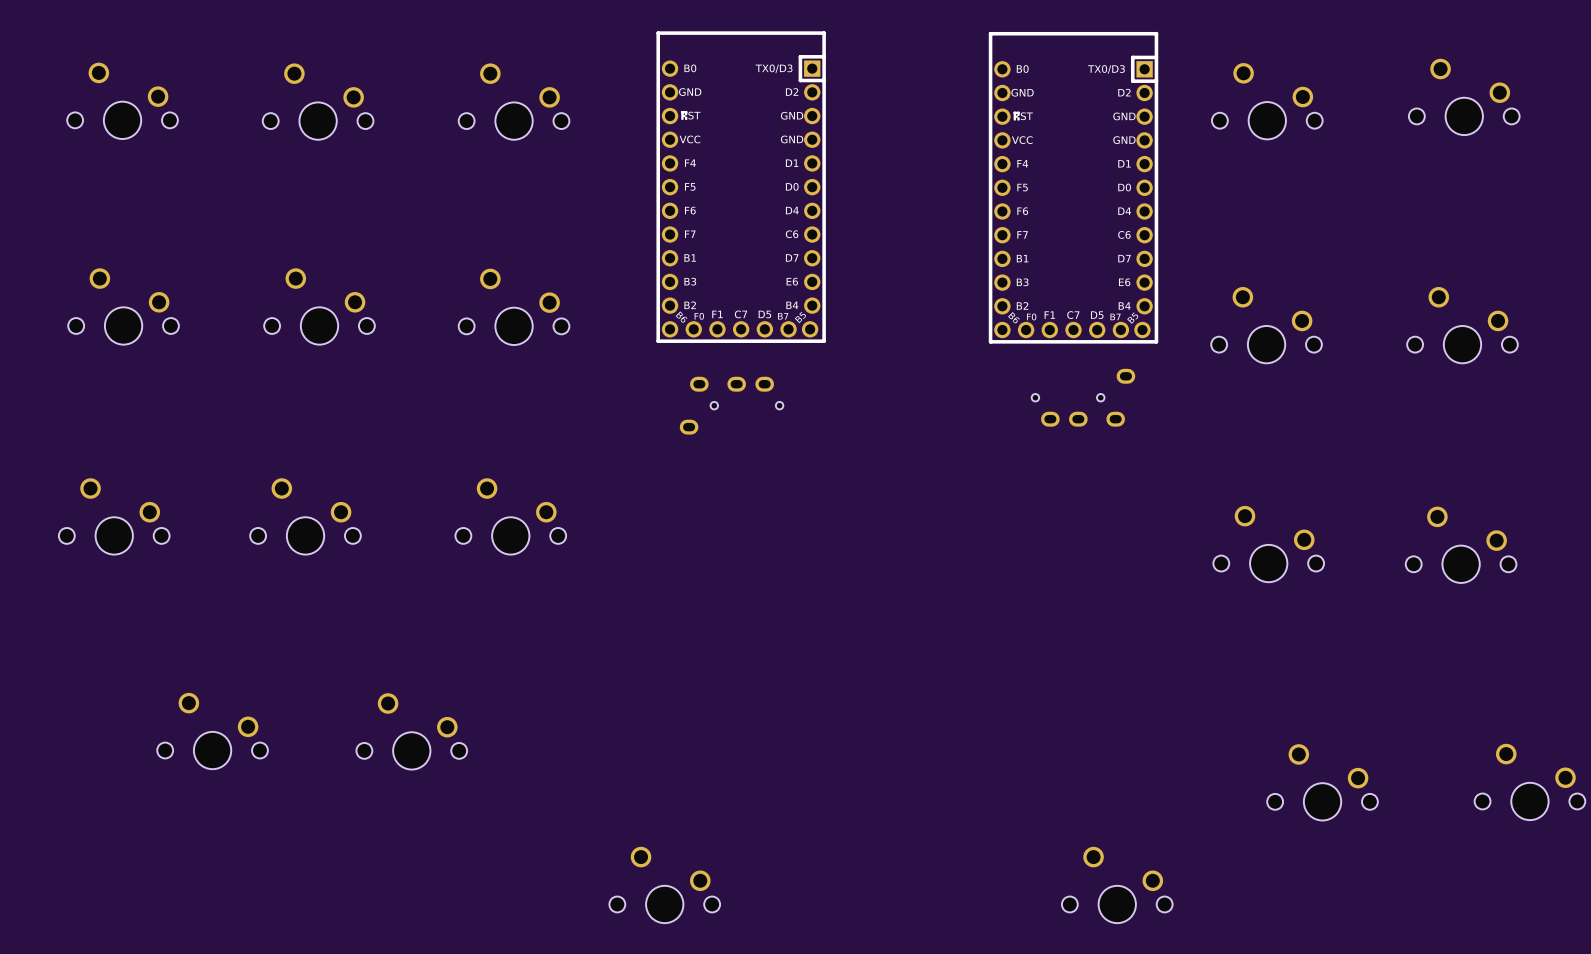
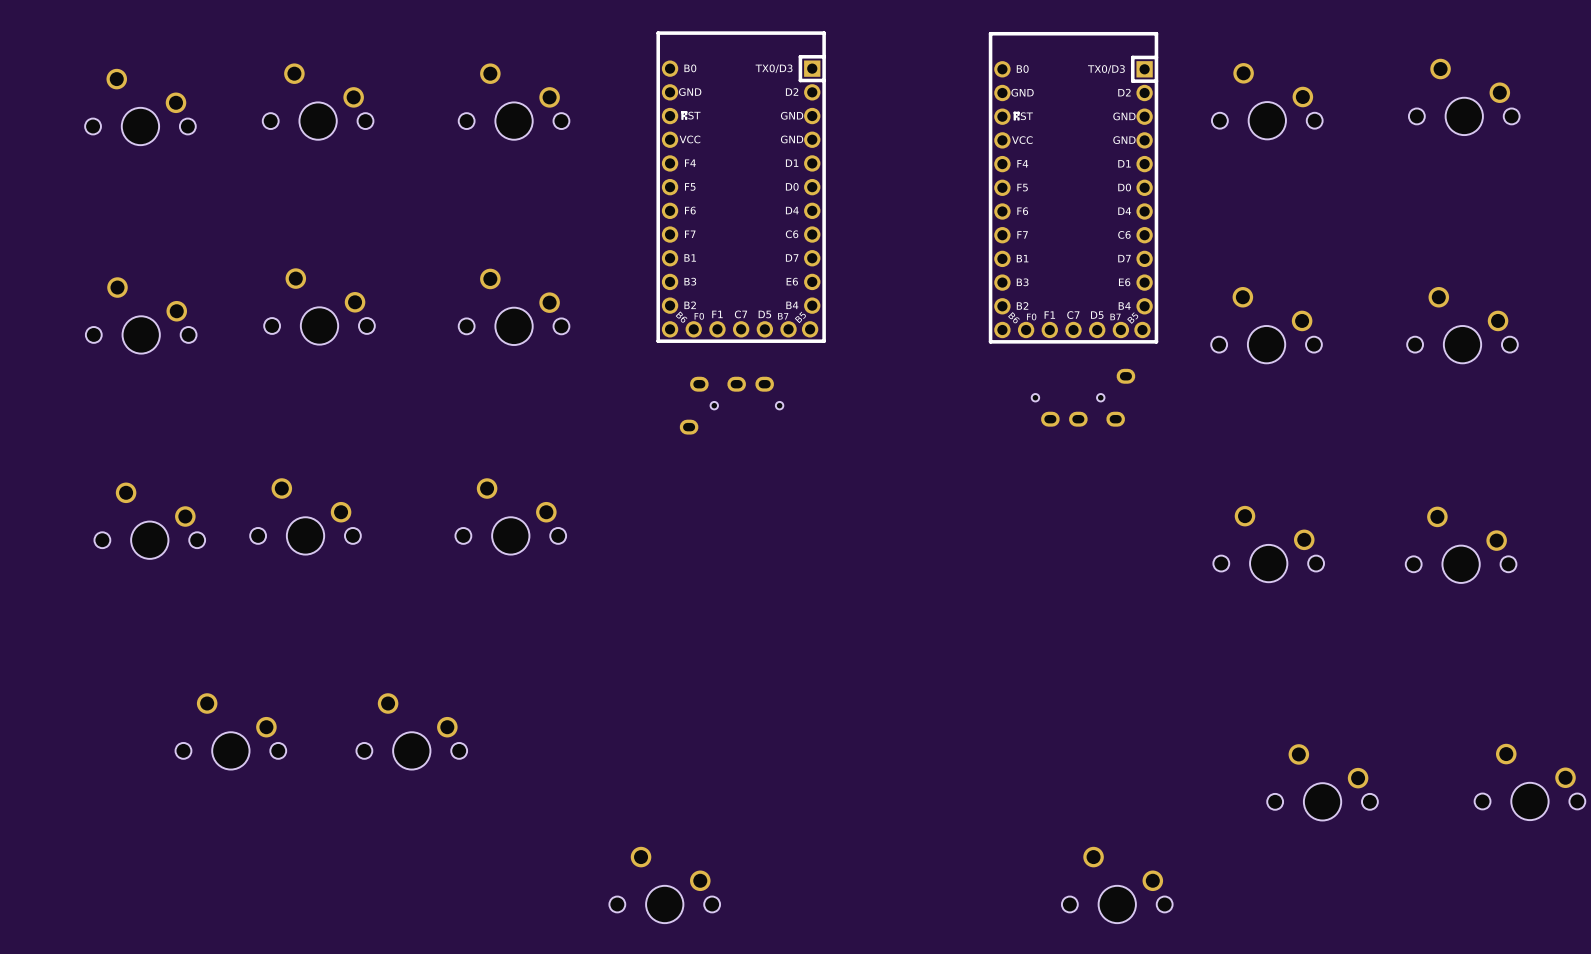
part position: (122, 100) -> (140, 106)
part position: (123, 306) -> (141, 315)
part position: (114, 516) -> (149, 520)
part position: (212, 731) -> (230, 731)

